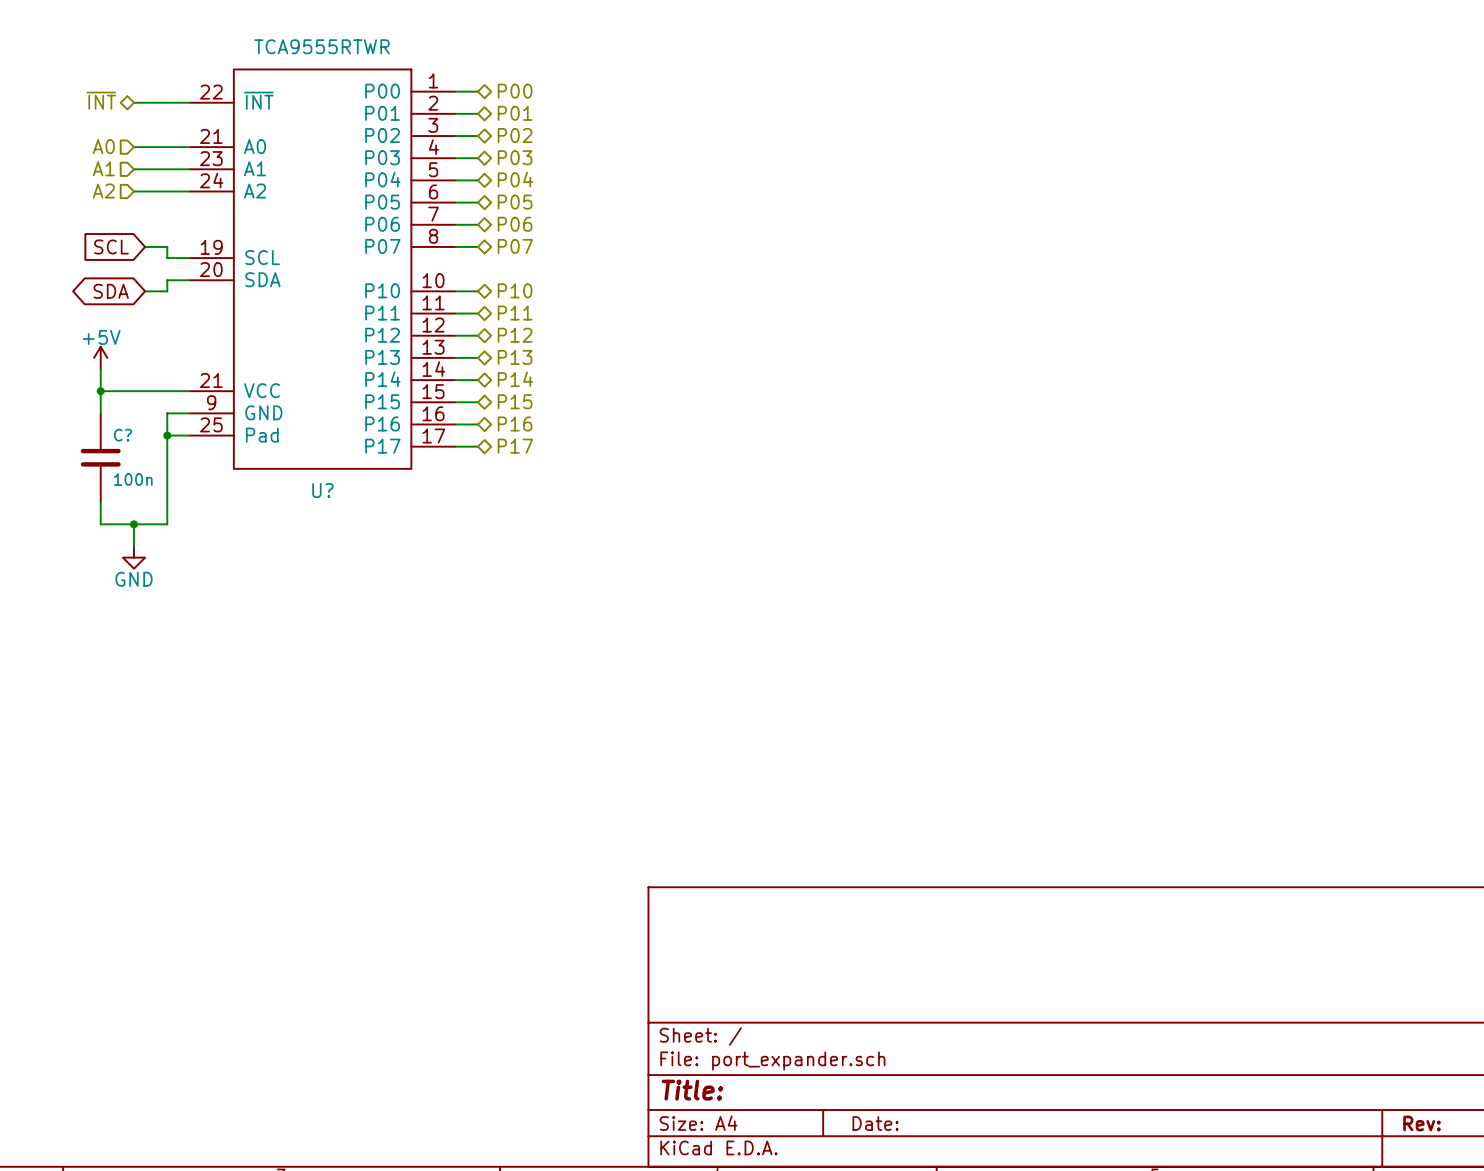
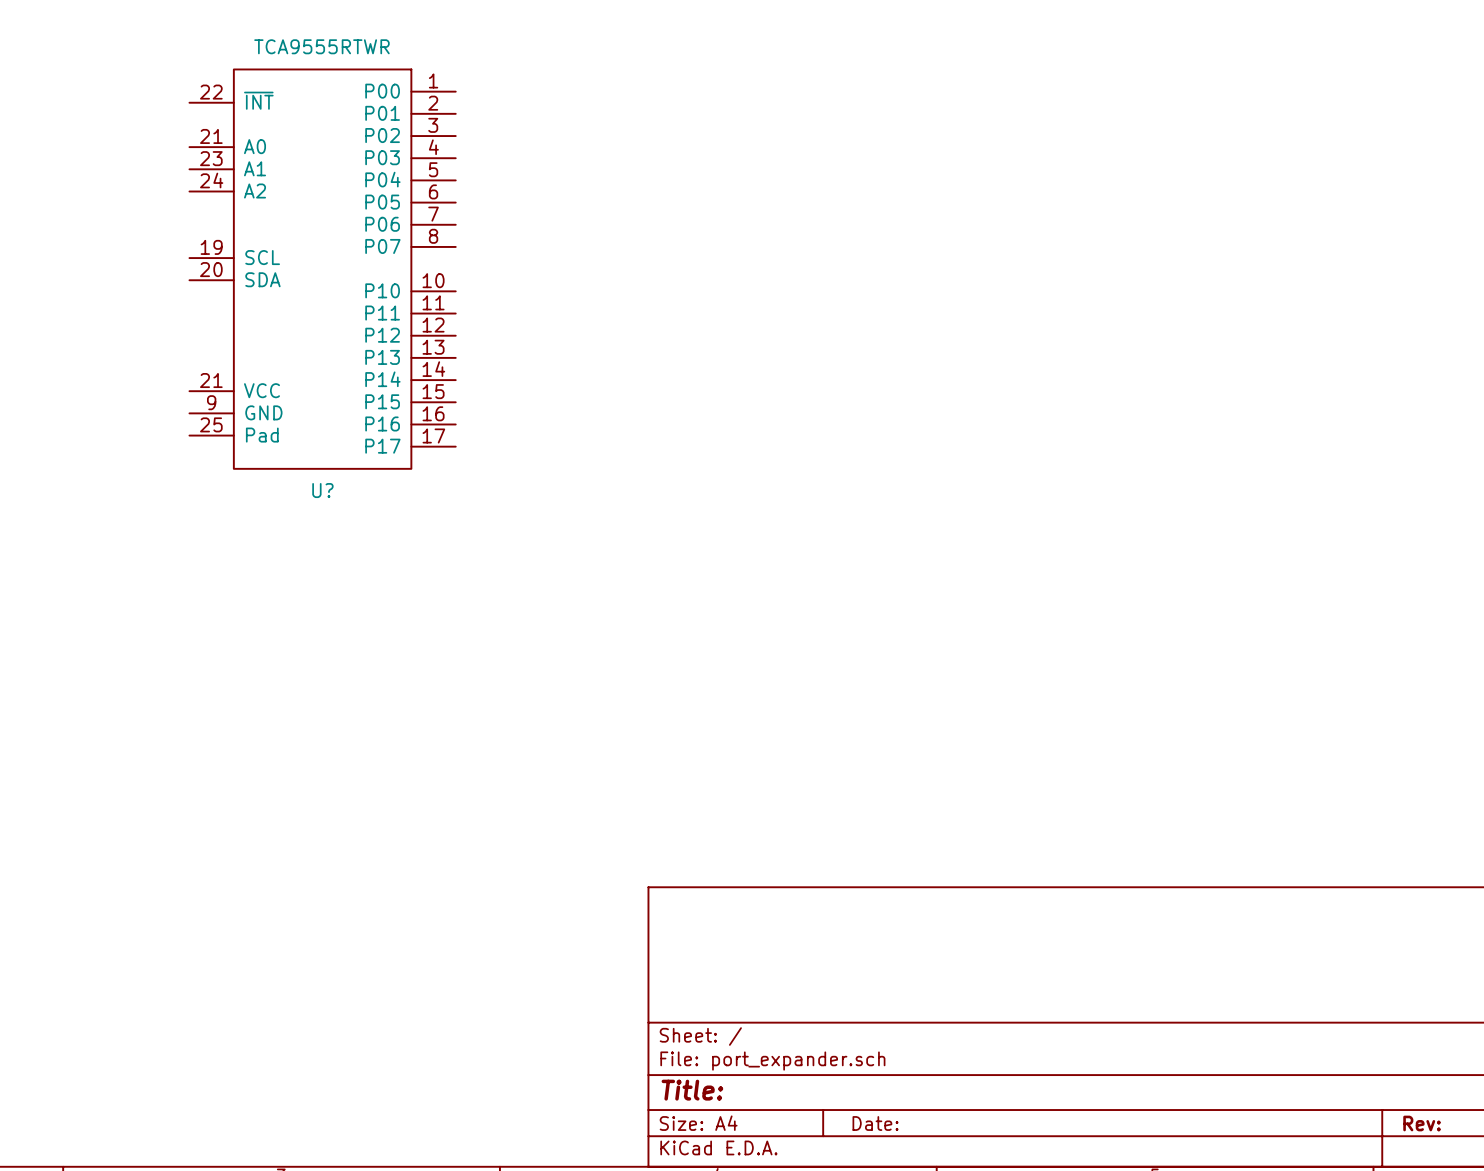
wire: (455, 91) (477, 91) -> none
hierarchical label: P00 (515, 91) -> none
hierarchical label: ~{INT} (101, 100) -> none
wire: (134, 102) (189, 102) -> none
wire: (455, 113) (477, 113) -> none
hierarchical label: P01 (515, 113) -> none
hierarchical label: P02 (515, 135) -> none
wire: (455, 136) (477, 136) -> none
hierarchical label: A0 (103, 146) -> none
wire: (134, 147) (189, 147) -> none
hierarchical label: P03 (515, 157) -> none
wire: (455, 158) (477, 158) -> none
hierarchical label: A1 (103, 168) -> none
wire: (134, 169) (189, 169) -> none
hierarchical label: P04 (515, 179) -> none
wire: (455, 180) (477, 180) -> none
hierarchical label: A2 (103, 191) -> none
wire: (134, 191) (189, 191) -> none
wire: (455, 202) (477, 202) -> none
hierarchical label: P05 (515, 202) -> none
wire: (455, 224) (477, 224) -> none
hierarchical label: P06 (515, 224) -> none
global label: SCL (111, 246) -> none
wire: (145, 246) (167, 246) (167, 258) (189, 258) -> none
wire: (455, 246) (477, 246) -> none
hierarchical label: P07 (515, 246) -> none
wire: (189, 280) (167, 280) (167, 291) (145, 291) -> none
hierarchical label: P10 (515, 290) -> none
global label: SDA (111, 291) -> none
wire: (455, 291) (477, 291) -> none
wire: (455, 313) (477, 313) -> none
hierarchical label: P11 (515, 313) -> none
wire: (455, 335) (477, 335) -> none
hierarchical label: P12 (515, 335) -> none
power symbol: +5V (100, 357) -> none
wire: (455, 357) (477, 357) -> none
hierarchical label: P13 (515, 357) -> none
wire: (100, 369) (100, 413) -> none
hierarchical label: P14 (515, 379) -> none
wire: (455, 380) (477, 380) -> none
wire: (100, 391) (189, 391) -> none
junction: (100, 391) -> none
hierarchical label: P15 (515, 401) -> none
wire: (455, 402) (477, 402) -> none
wire: (189, 413) (167, 413) (167, 524) (100, 524) (100, 502) -> none
hierarchical label: P16 (515, 423) -> none
wire: (455, 424) (477, 424) -> none
wire: (167, 435) (189, 435) -> none
junction: (167, 435) -> none
wire: (455, 446) (477, 446) -> none
hierarchical label: P17 (515, 446) -> none
C?: 100n (100, 457) -> none
wire: (134, 524) (134, 546) -> none
junction: (134, 524) -> none
power symbol: GND (134, 557) -> none

